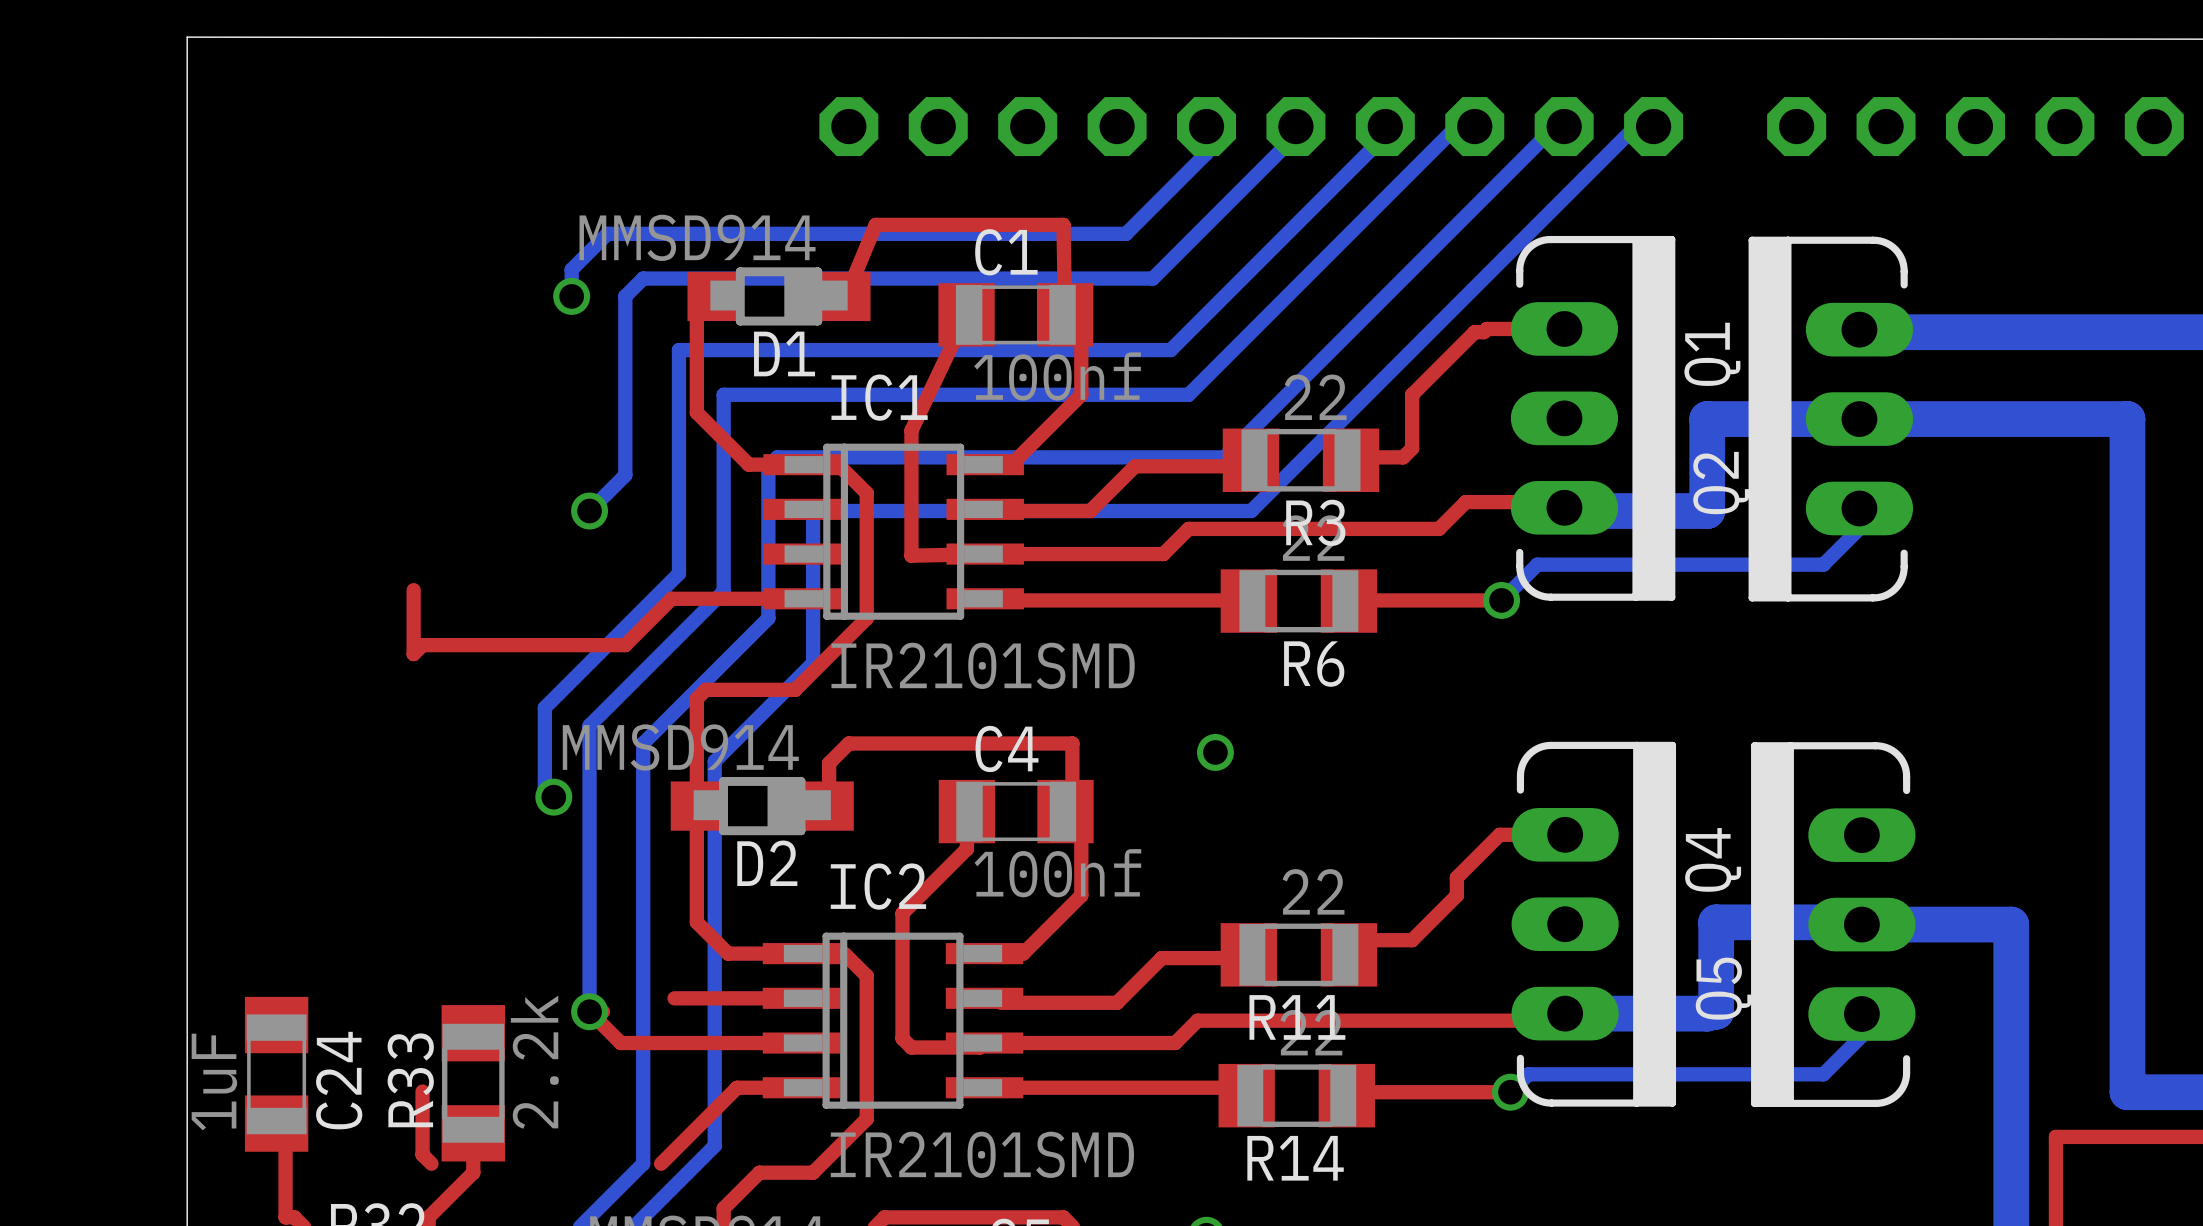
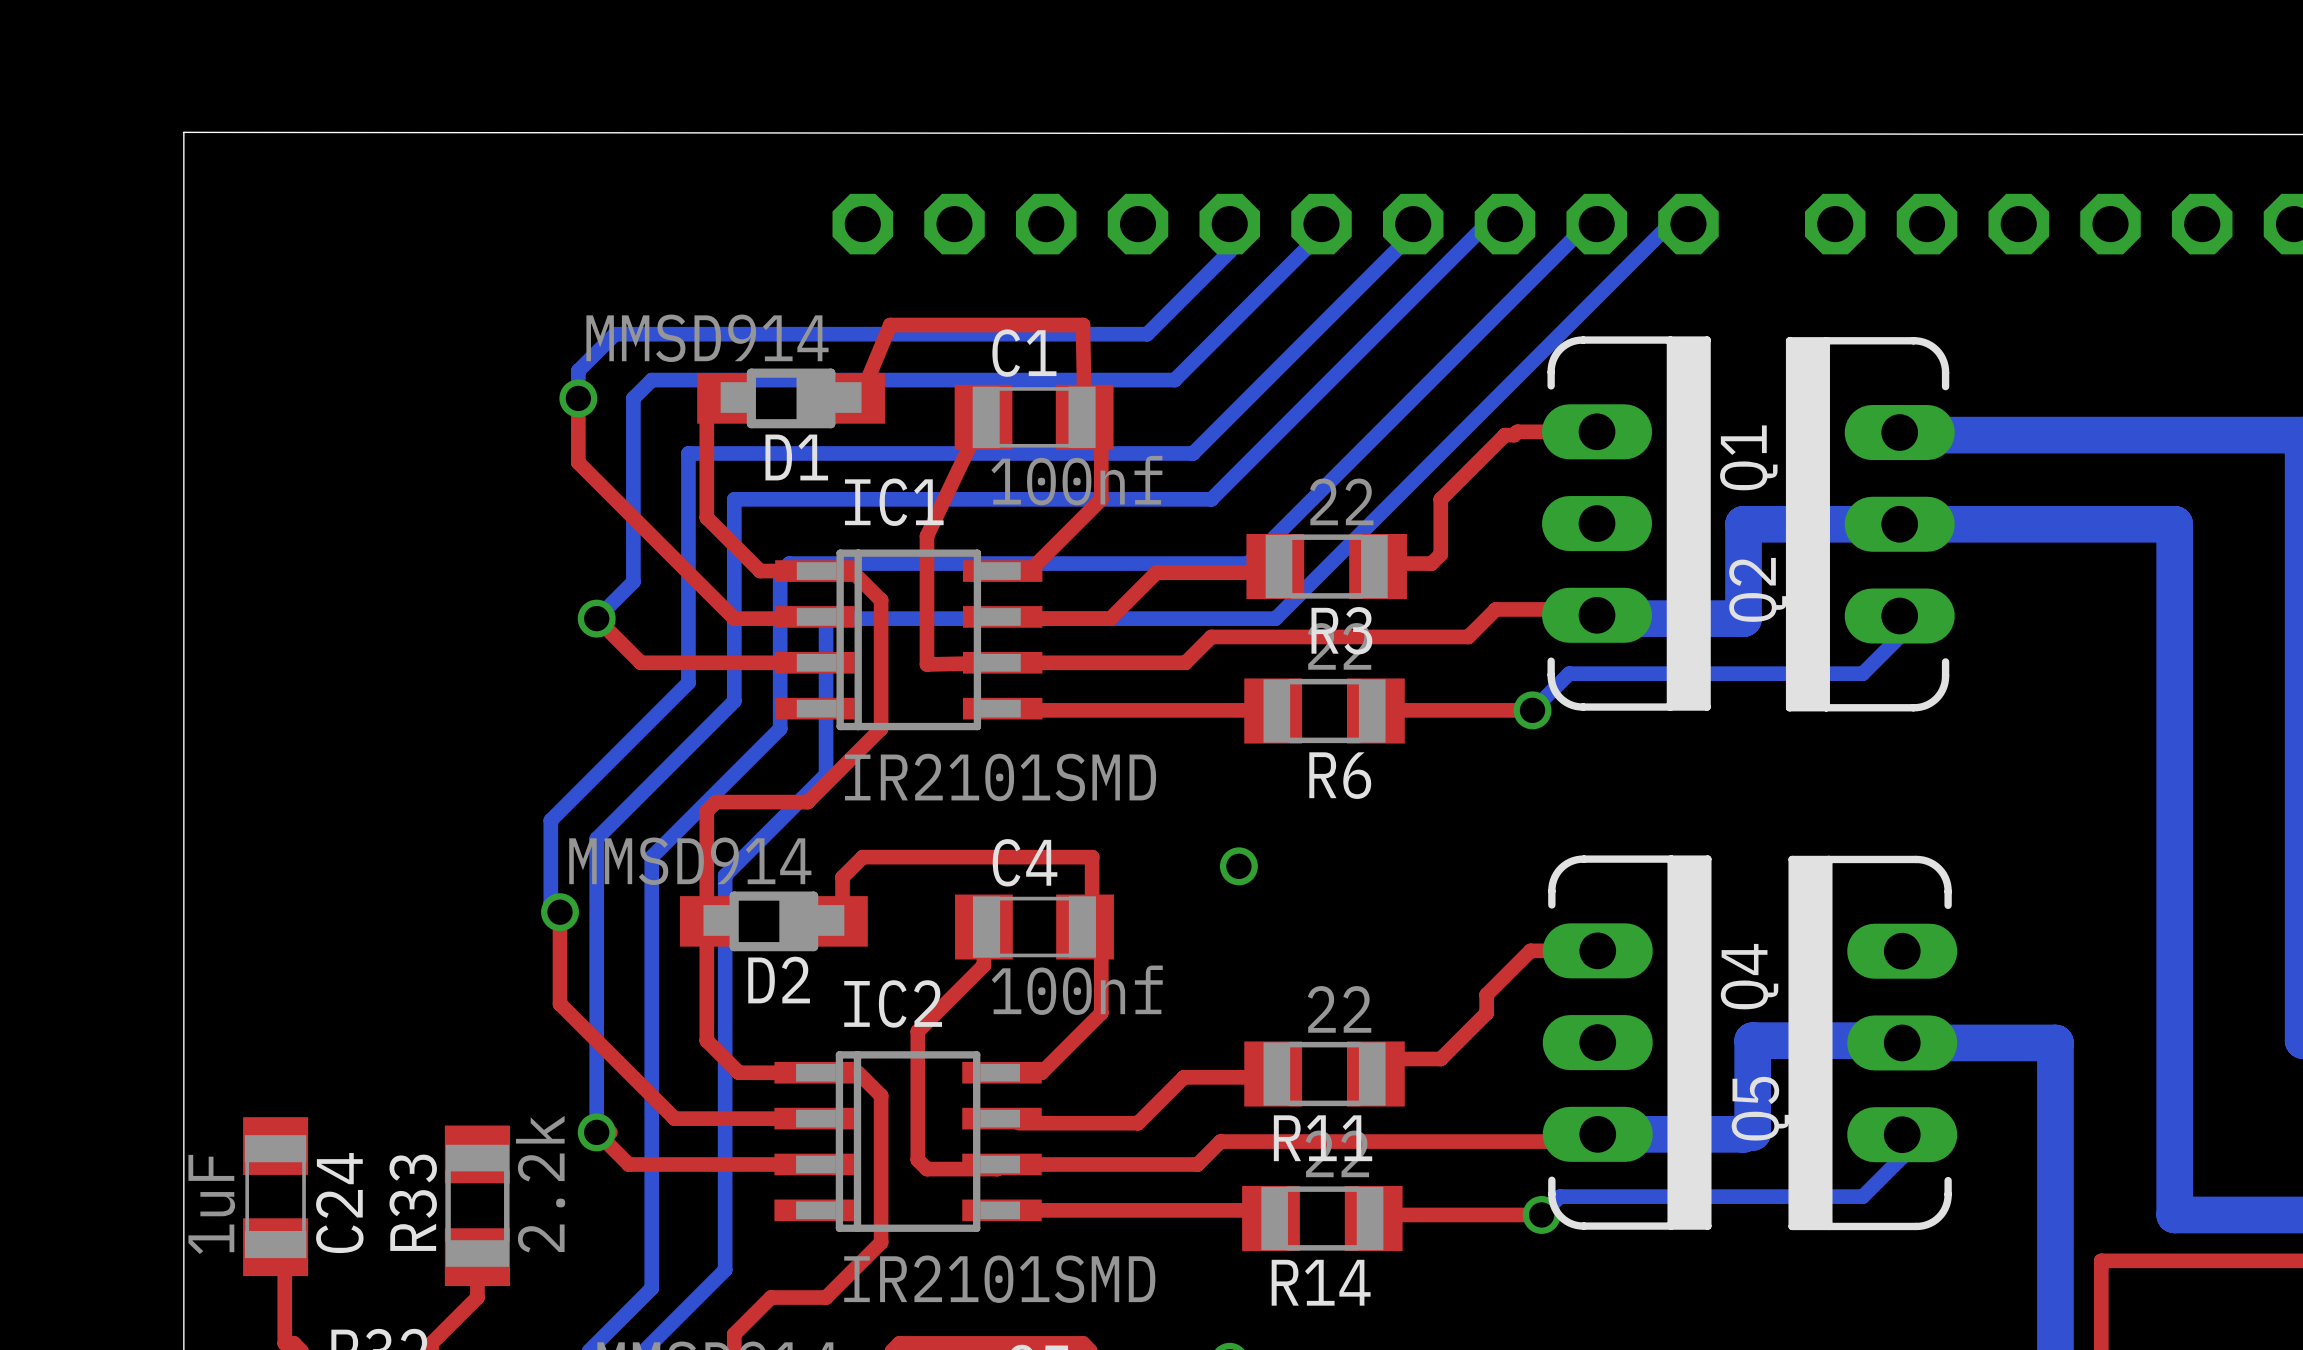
top track: none -> (578, 398) (578, 462) (734, 618) (813, 618) (814, 616)
top track: none -> (596, 618) (640, 662) (814, 662)
top track: (413, 590) (413, 654) (422, 645) (625, 645) (671, 598) (802, 598) -> none
top track: none -> (560, 912) (560, 1003) (674, 1118) (683, 1118)
top track: (801, 1087) (737, 1087) (661, 1163) -> none
top track: (422, 1091) (422, 1154) (431, 1163) -> none

